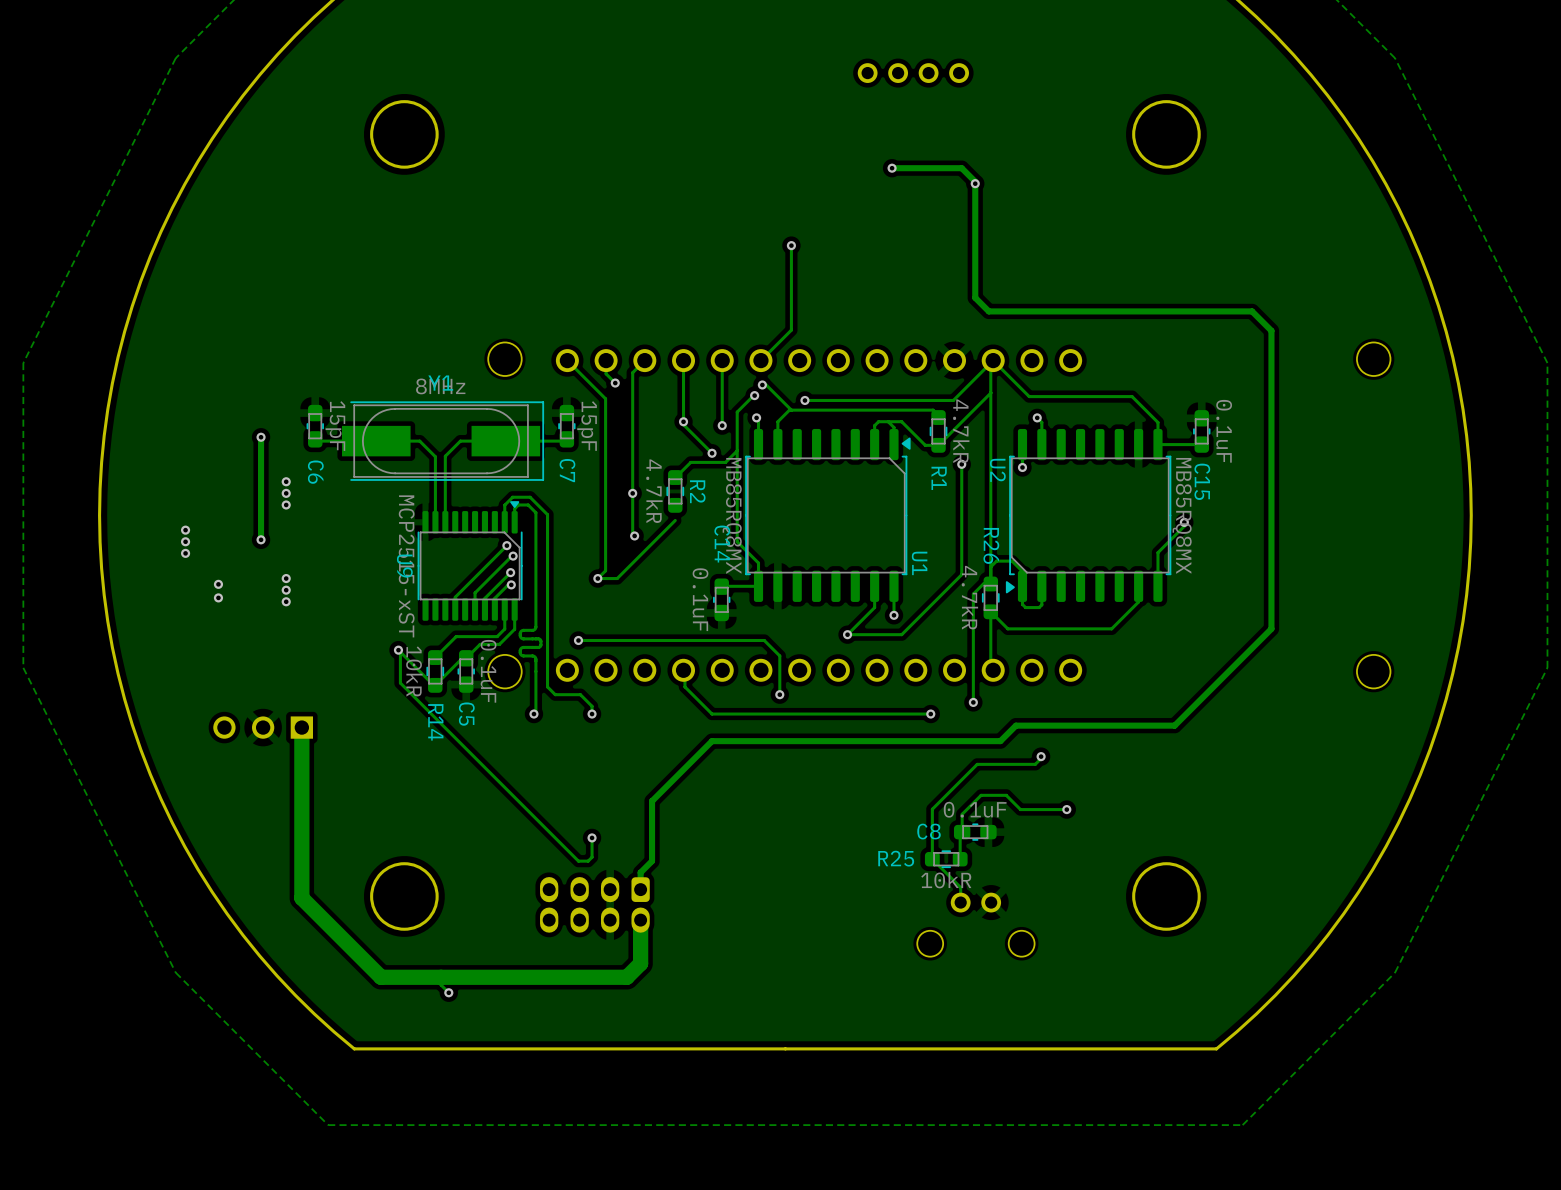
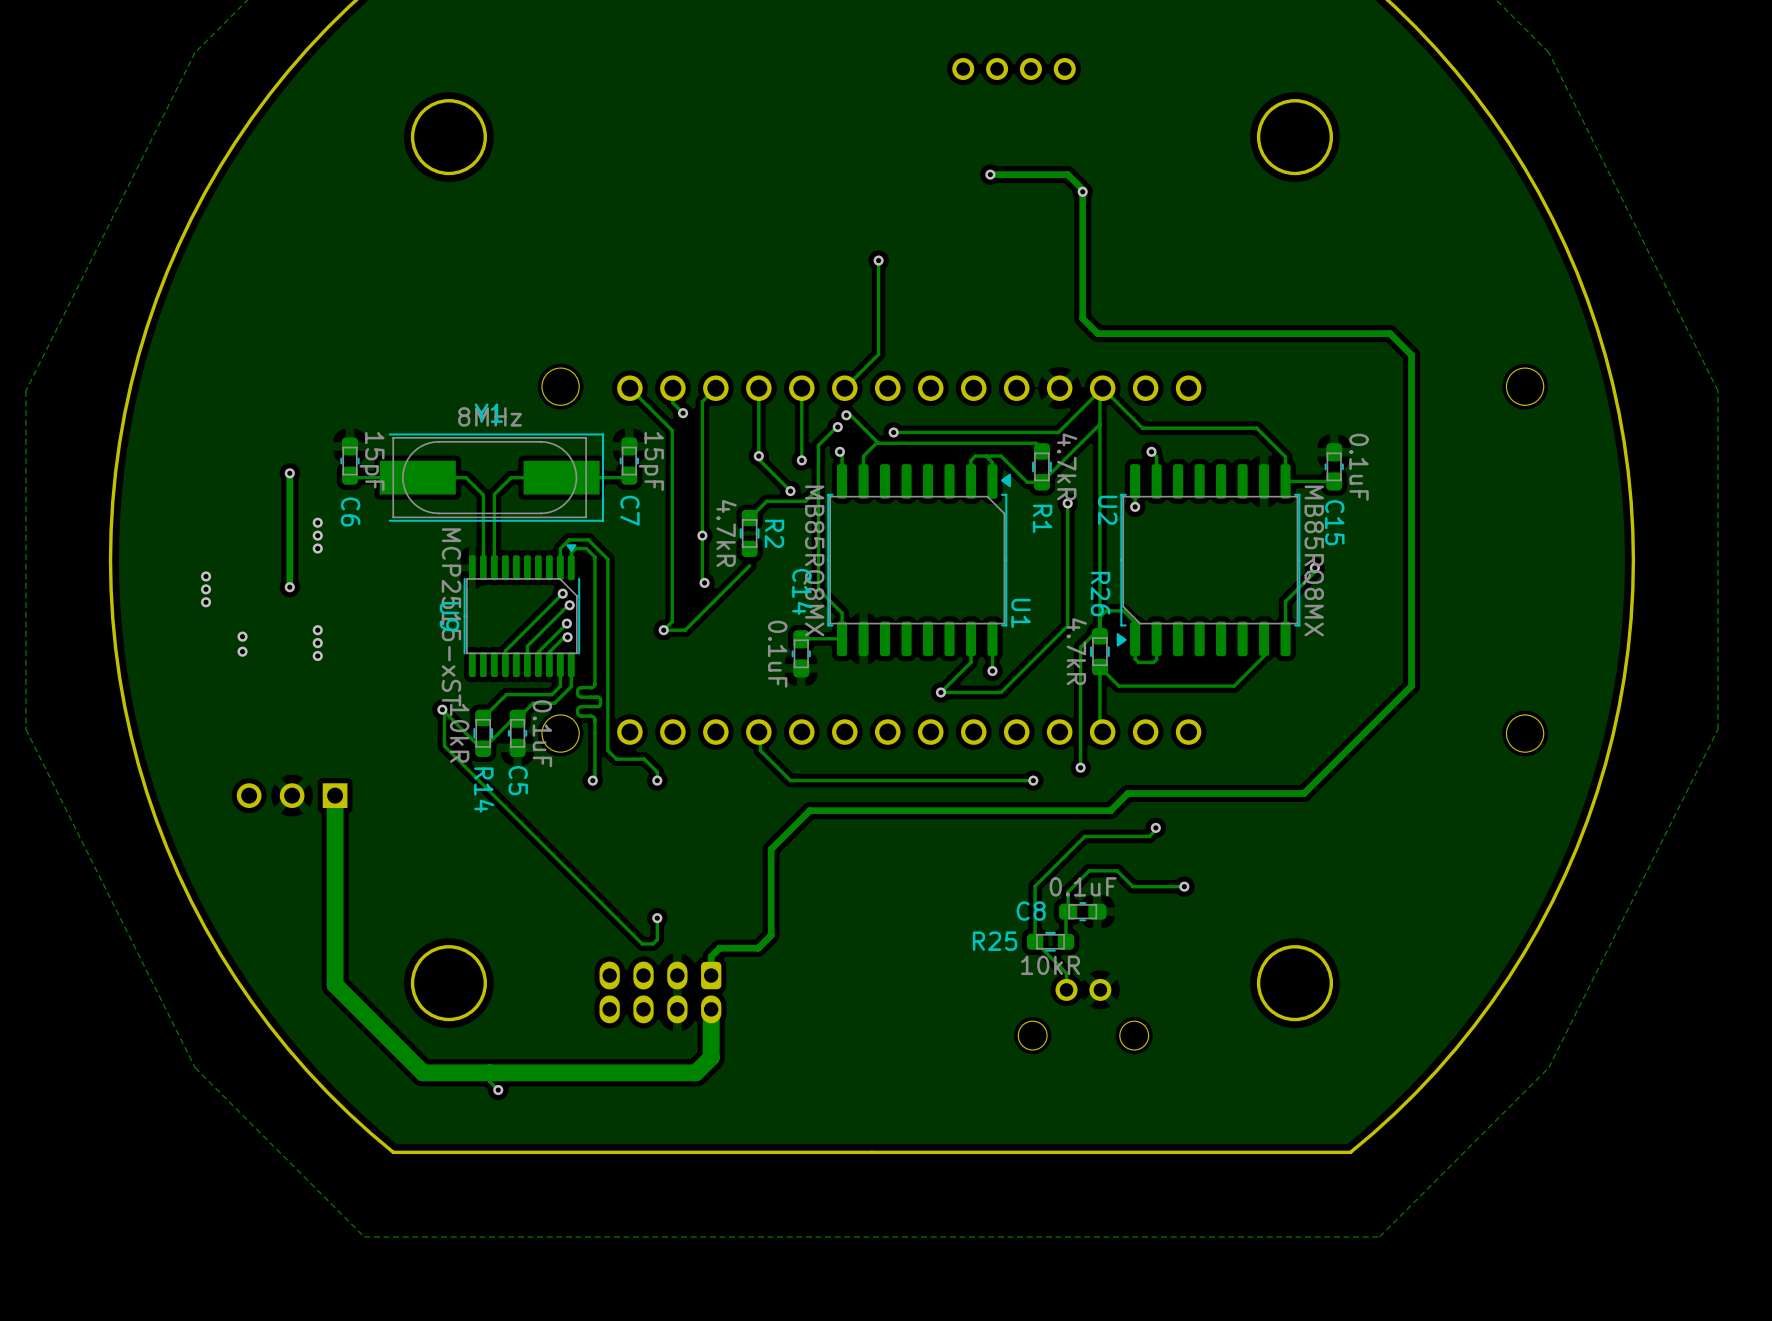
track: (578, 640) (764, 640) (779, 655) (779, 694) -> none
via: (578, 640) -> none
via: (779, 694) -> none
track: (729, 741) (712, 741) (652, 801) (652, 861) (648, 865) -> (809, 810) (771, 849) (771, 935) (758, 948) (719, 948)

